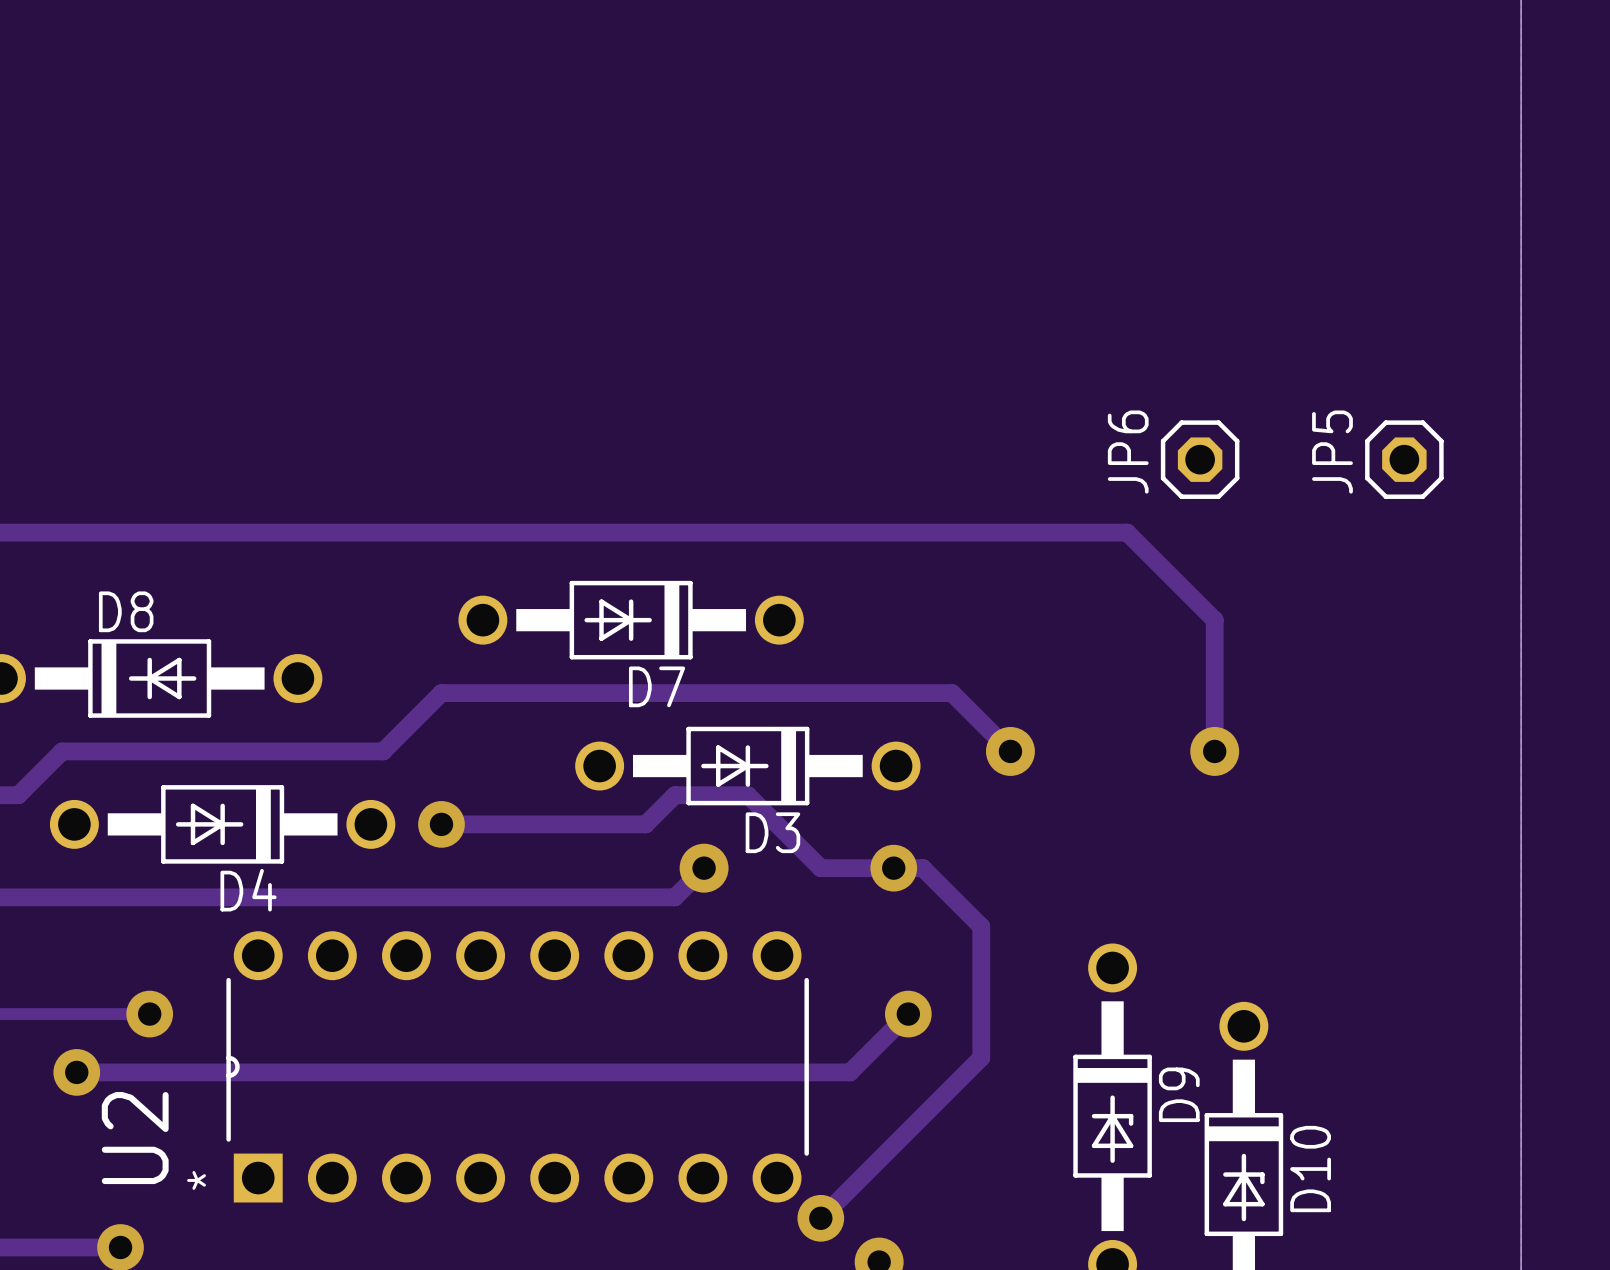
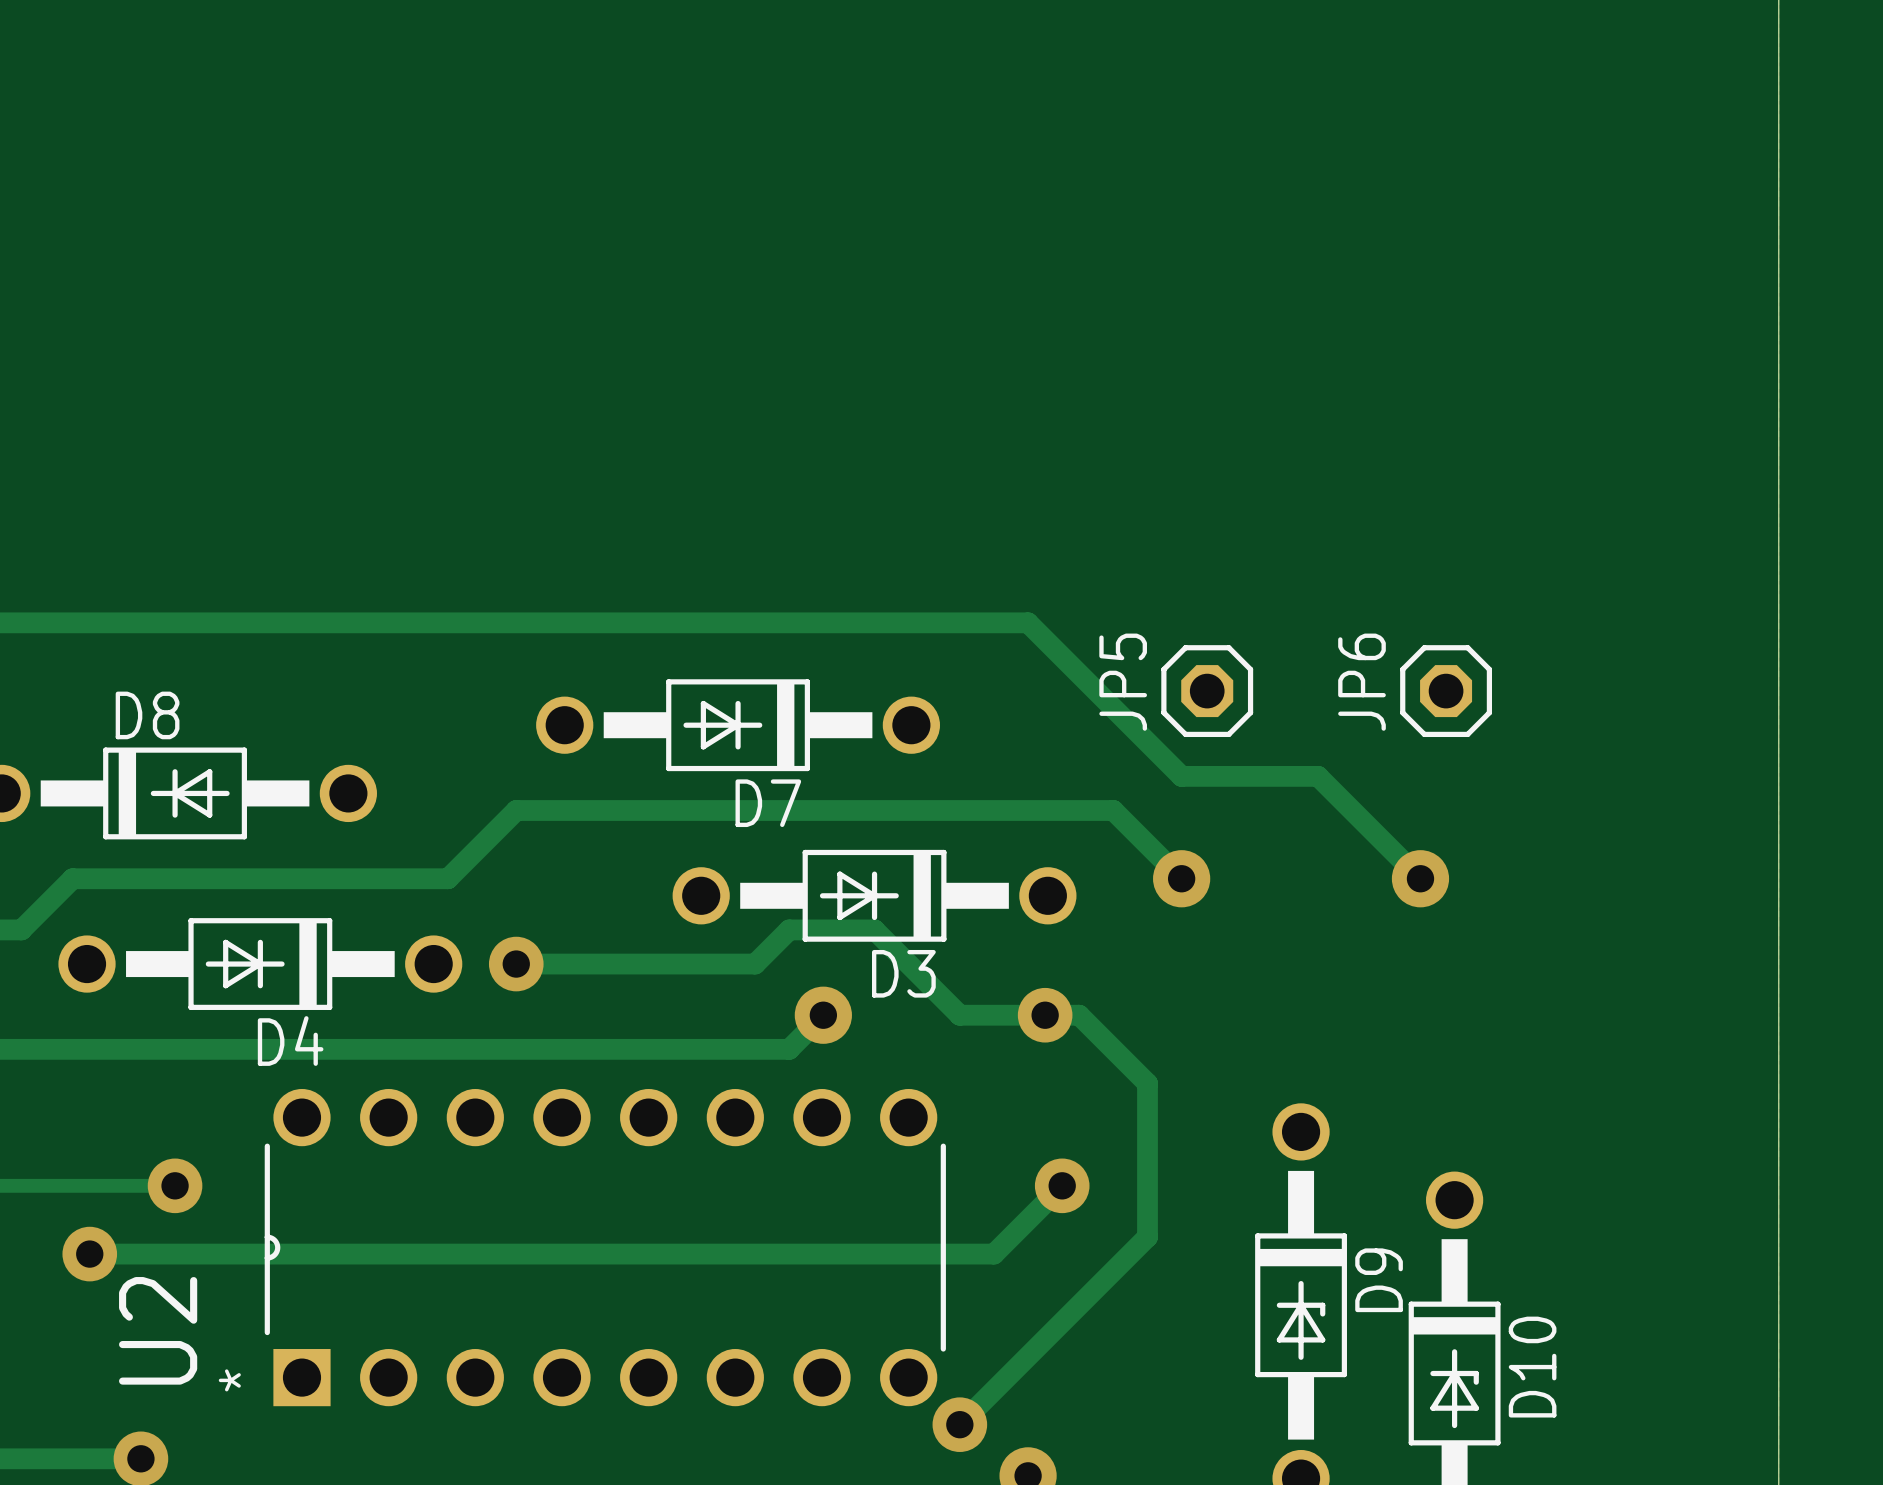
JP6 position: (1200, 459) -> (1446, 691)
JP5 position: (1404, 459) -> (1207, 691)
track: (879, 532) (1127, 532) (1214, 620) (1214, 751) -> (1028, 622) (1181, 776) (1318, 776) (1420, 878)

